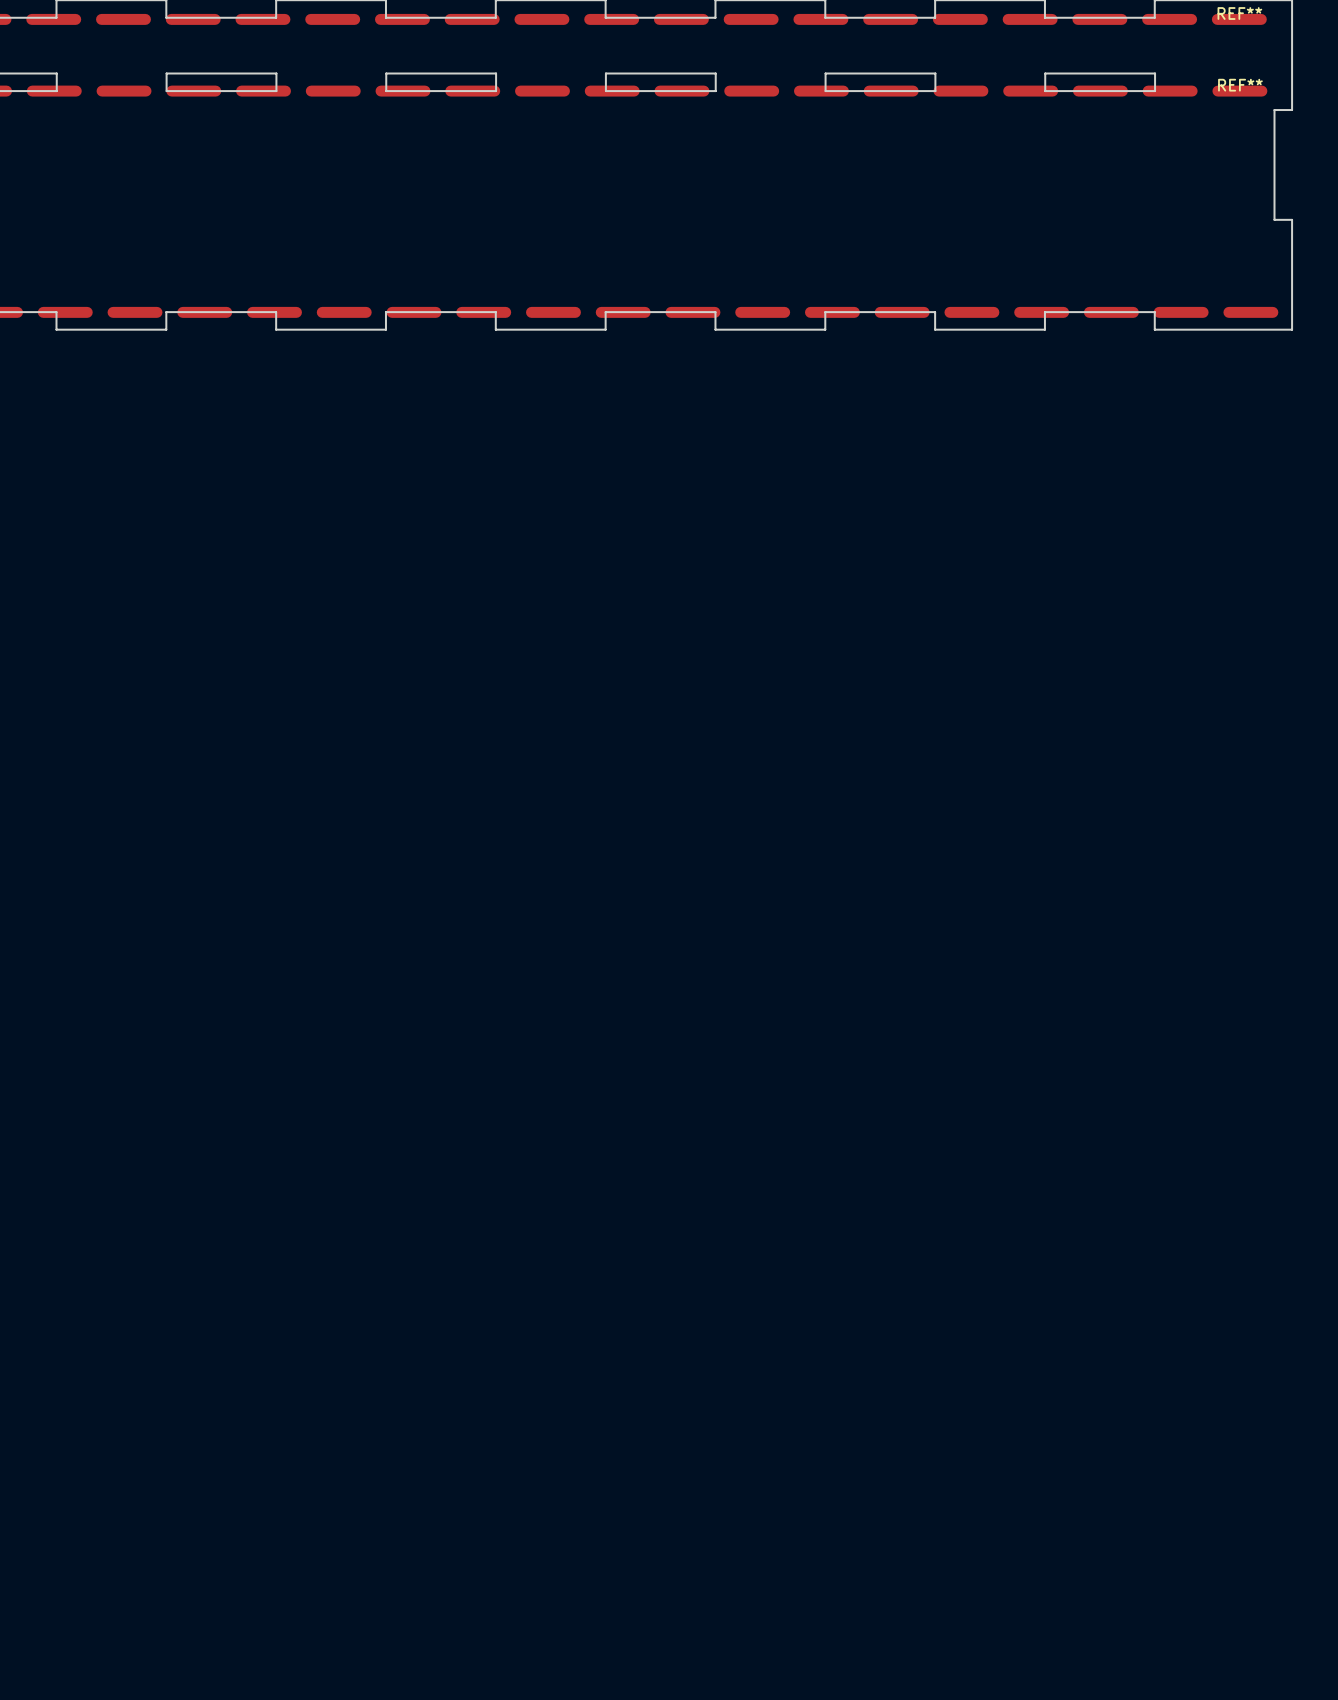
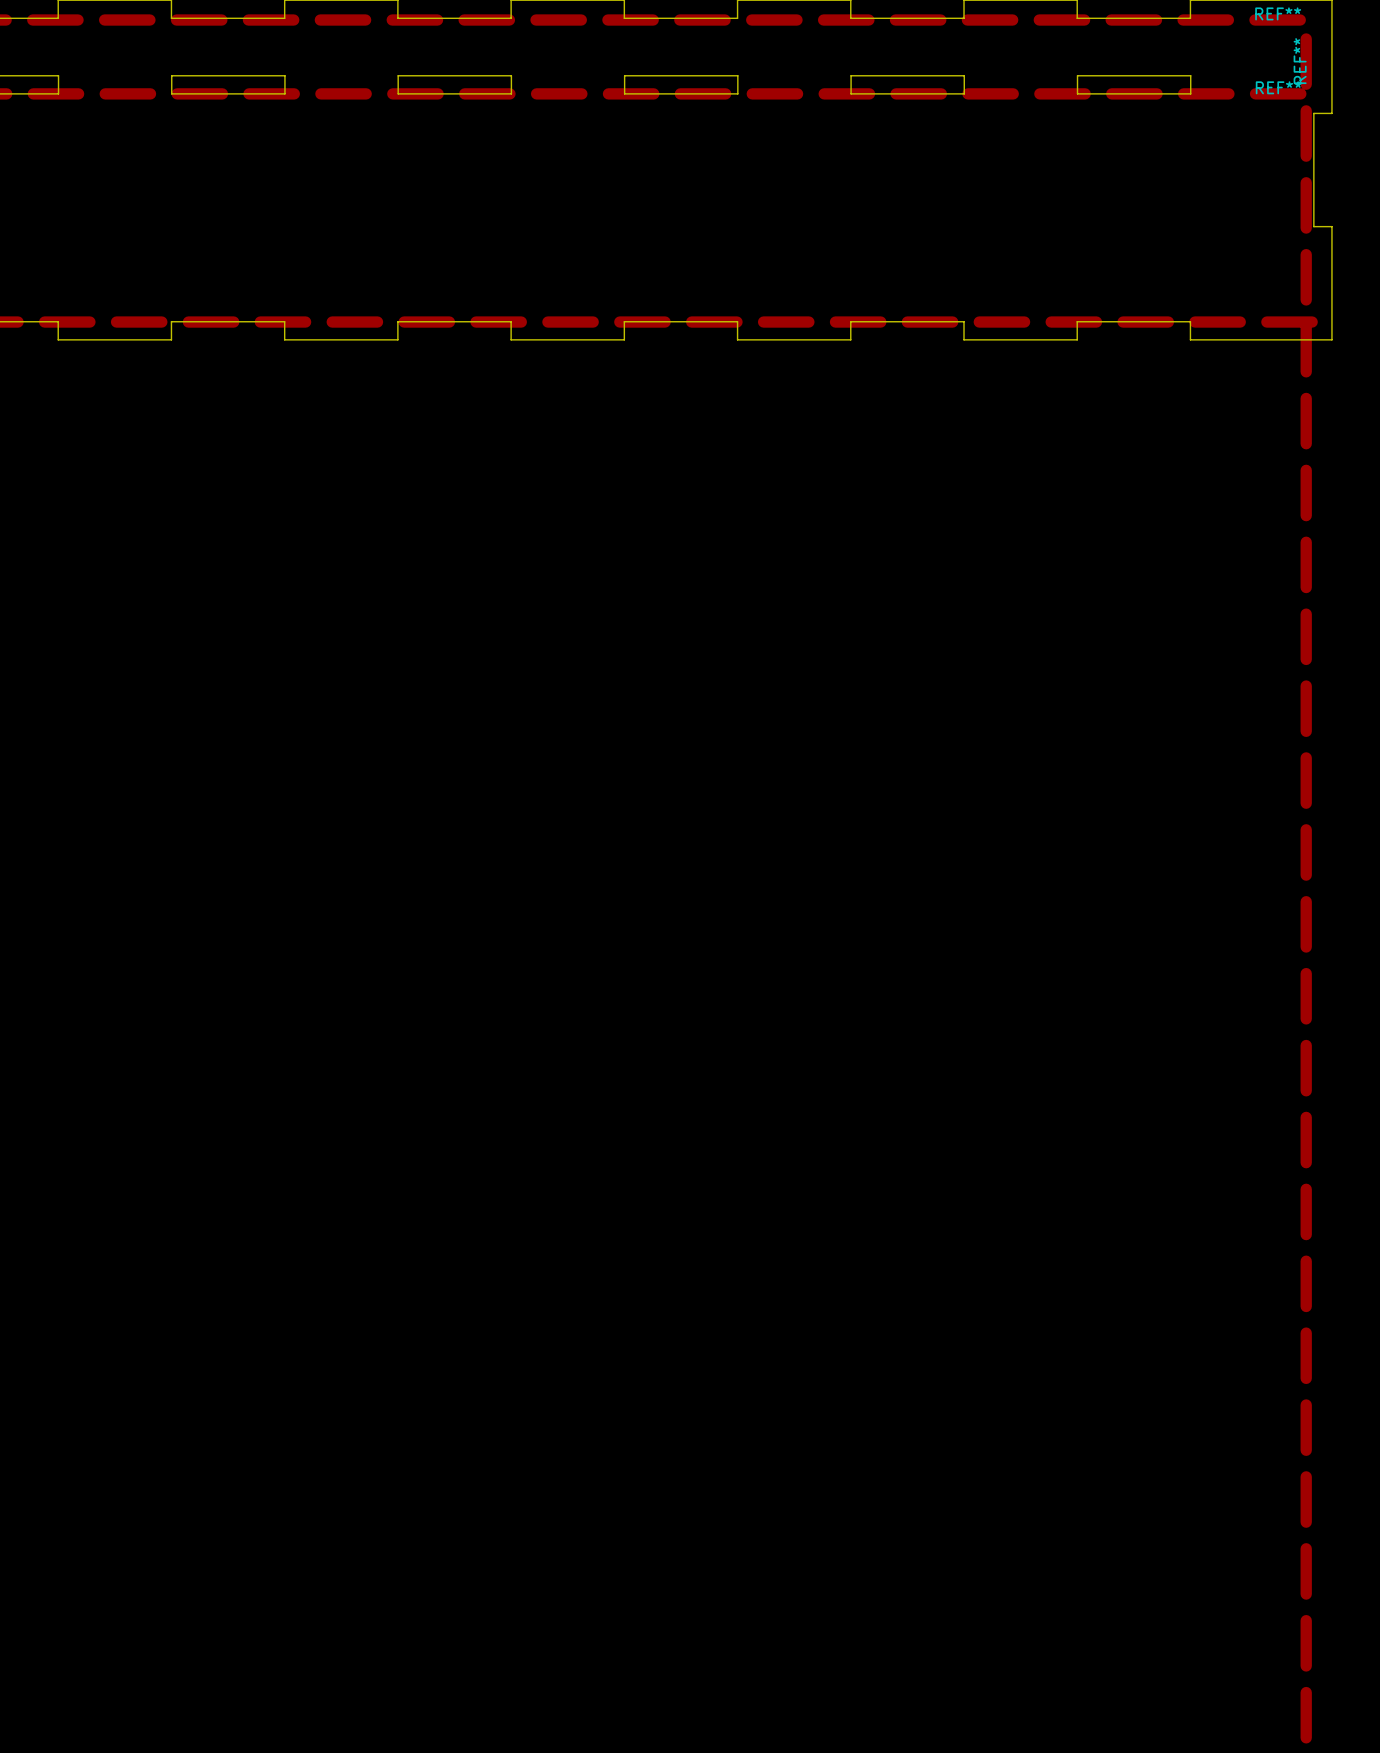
REF**: none -> (1306, 888)

